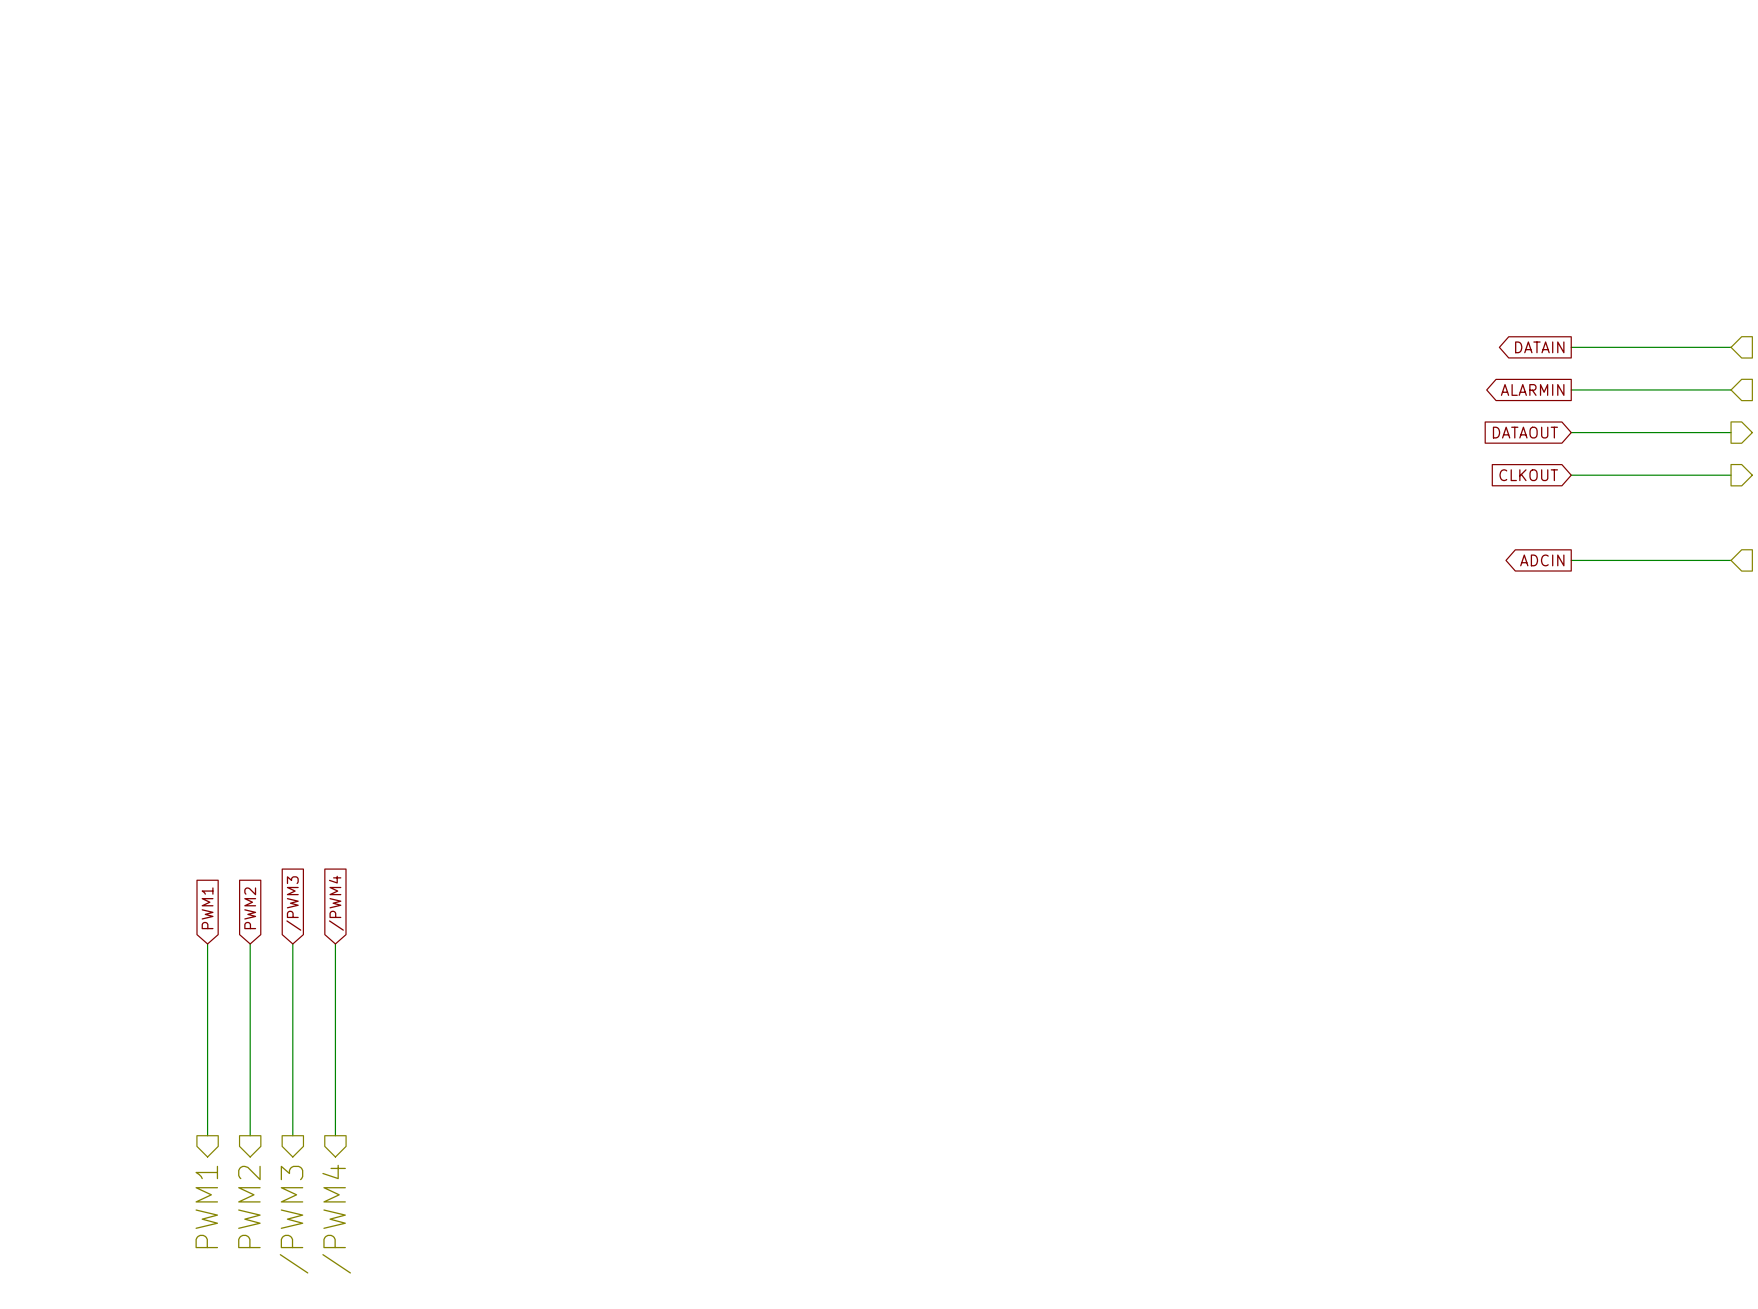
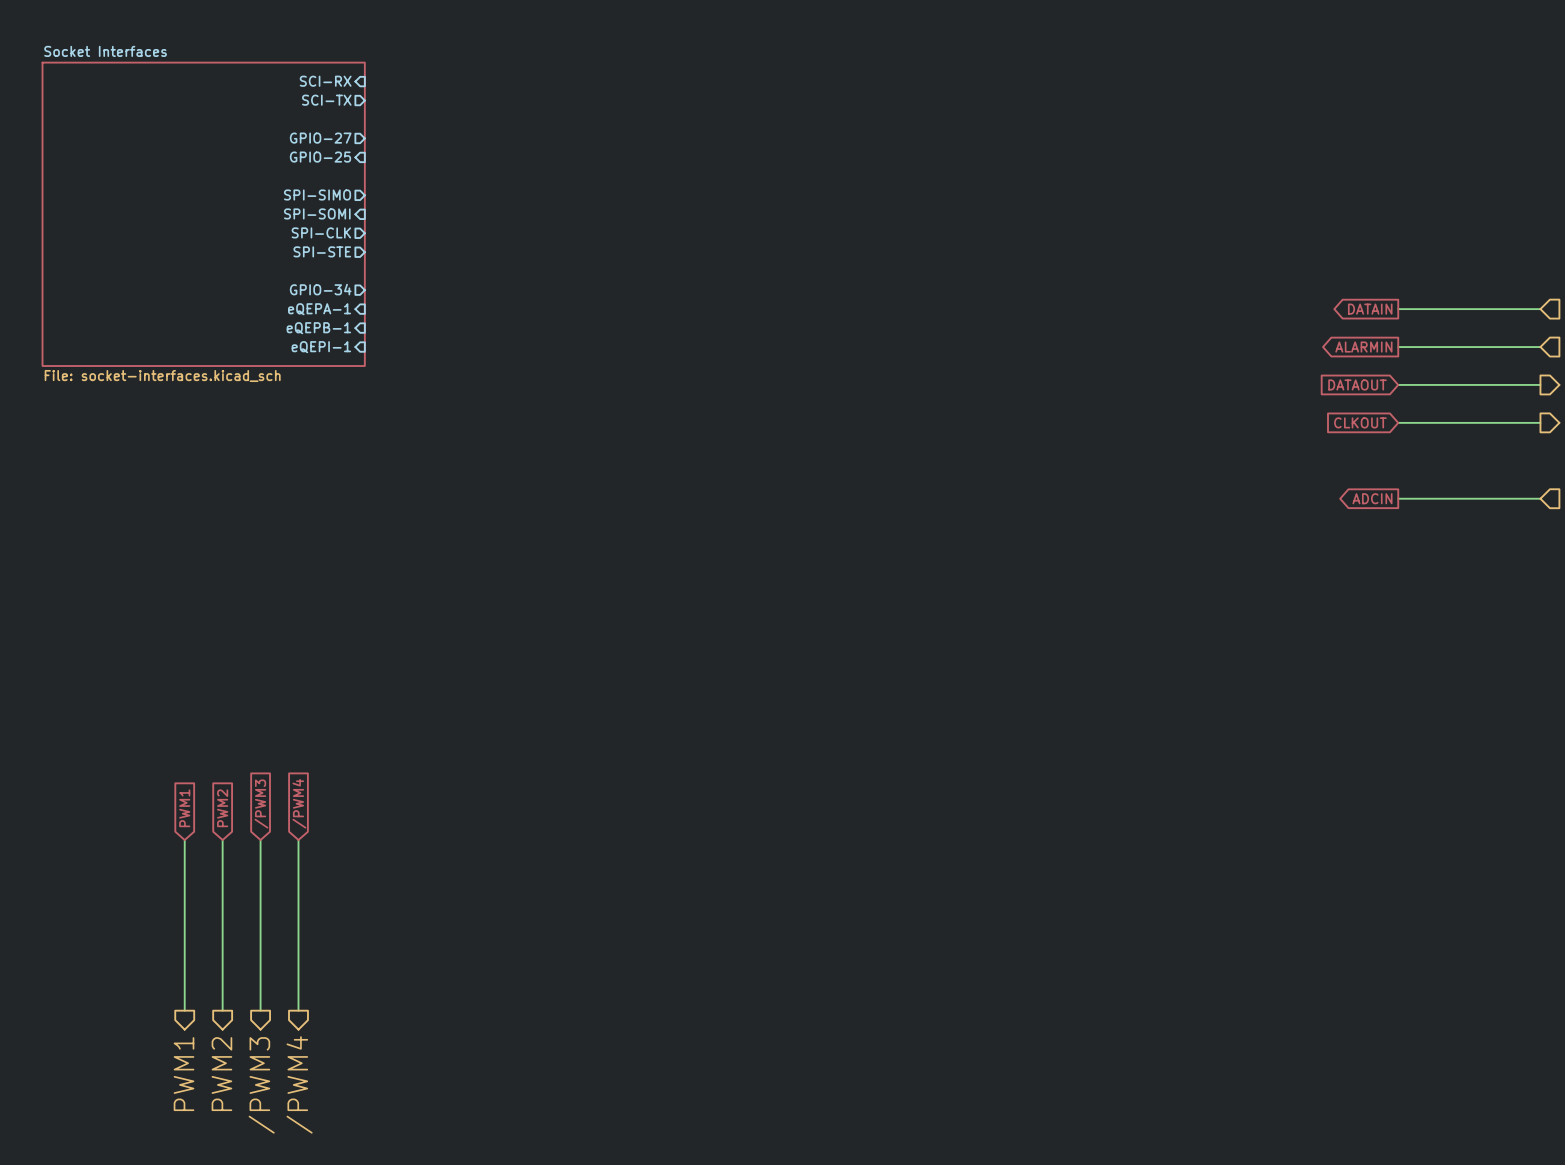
sheet pin: none -> SCI-RX (325, 81)
sheet pin: none -> SCI-TX (326, 100)
sheet pin: none -> GPIO-27 (320, 138)
sheet pin: none -> GPIO-25 (320, 157)
sheet pin: none -> SPI-SIMO (317, 194)
sheet Socket Interfaces: none -> File: socket-interfaces.kicad_sch (203, 214)
sheet pin: none -> SPI-SOMI (317, 213)
sheet pin: none -> SPI-CLK (321, 232)
sheet pin: none -> SPI-STE (322, 251)
sheet pin: none -> GPIO-34 (320, 289)
sheet pin: none -> eQEPA-1 (319, 309)
sheet pin: none -> eQEPB-1 (318, 328)
sheet pin: none -> eQEPI-1 (321, 347)

